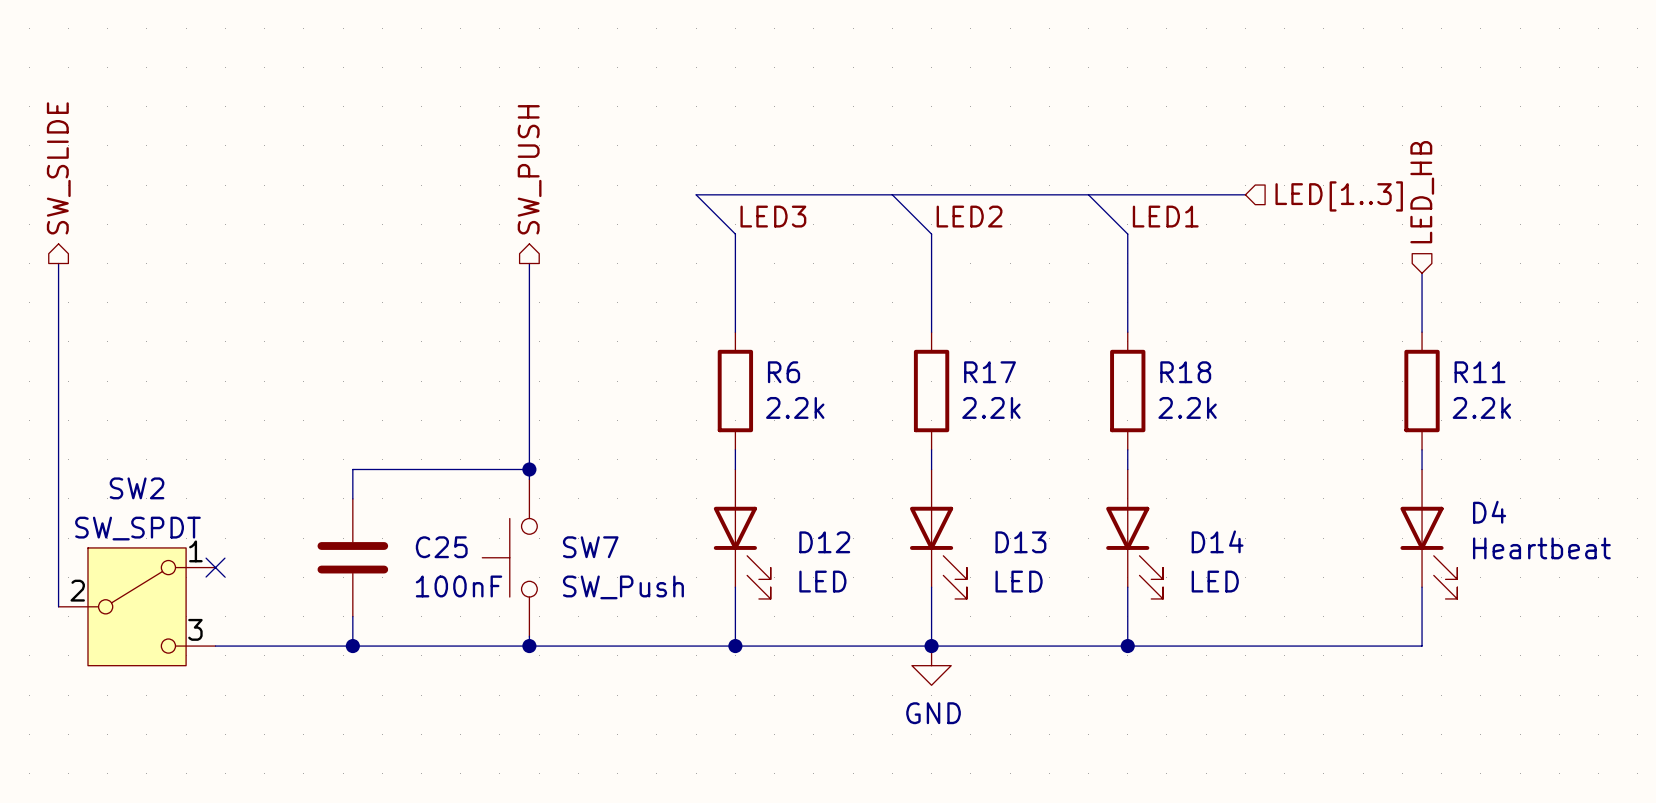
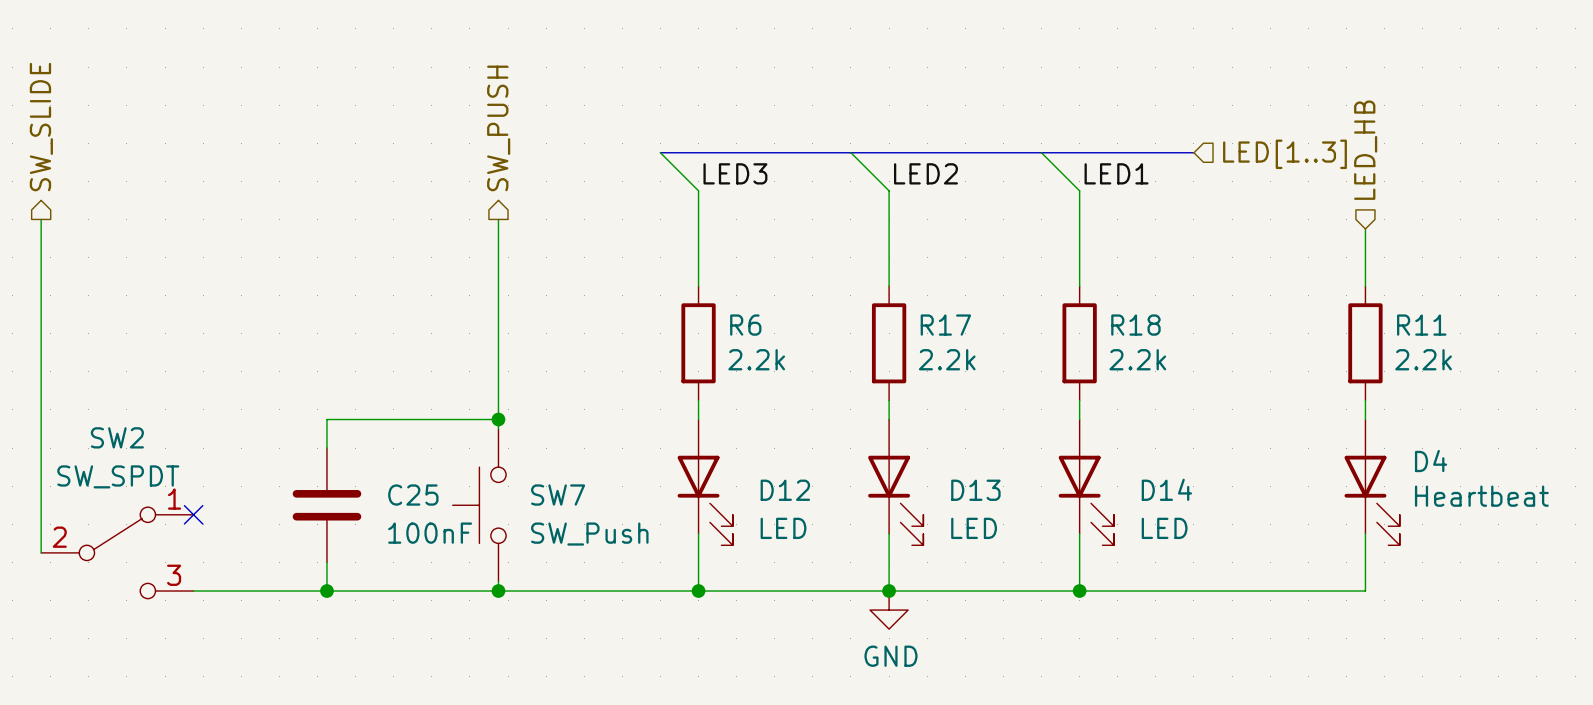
SW2 symbol: [58, 547, 216, 666] -> [41, 507, 194, 599]

